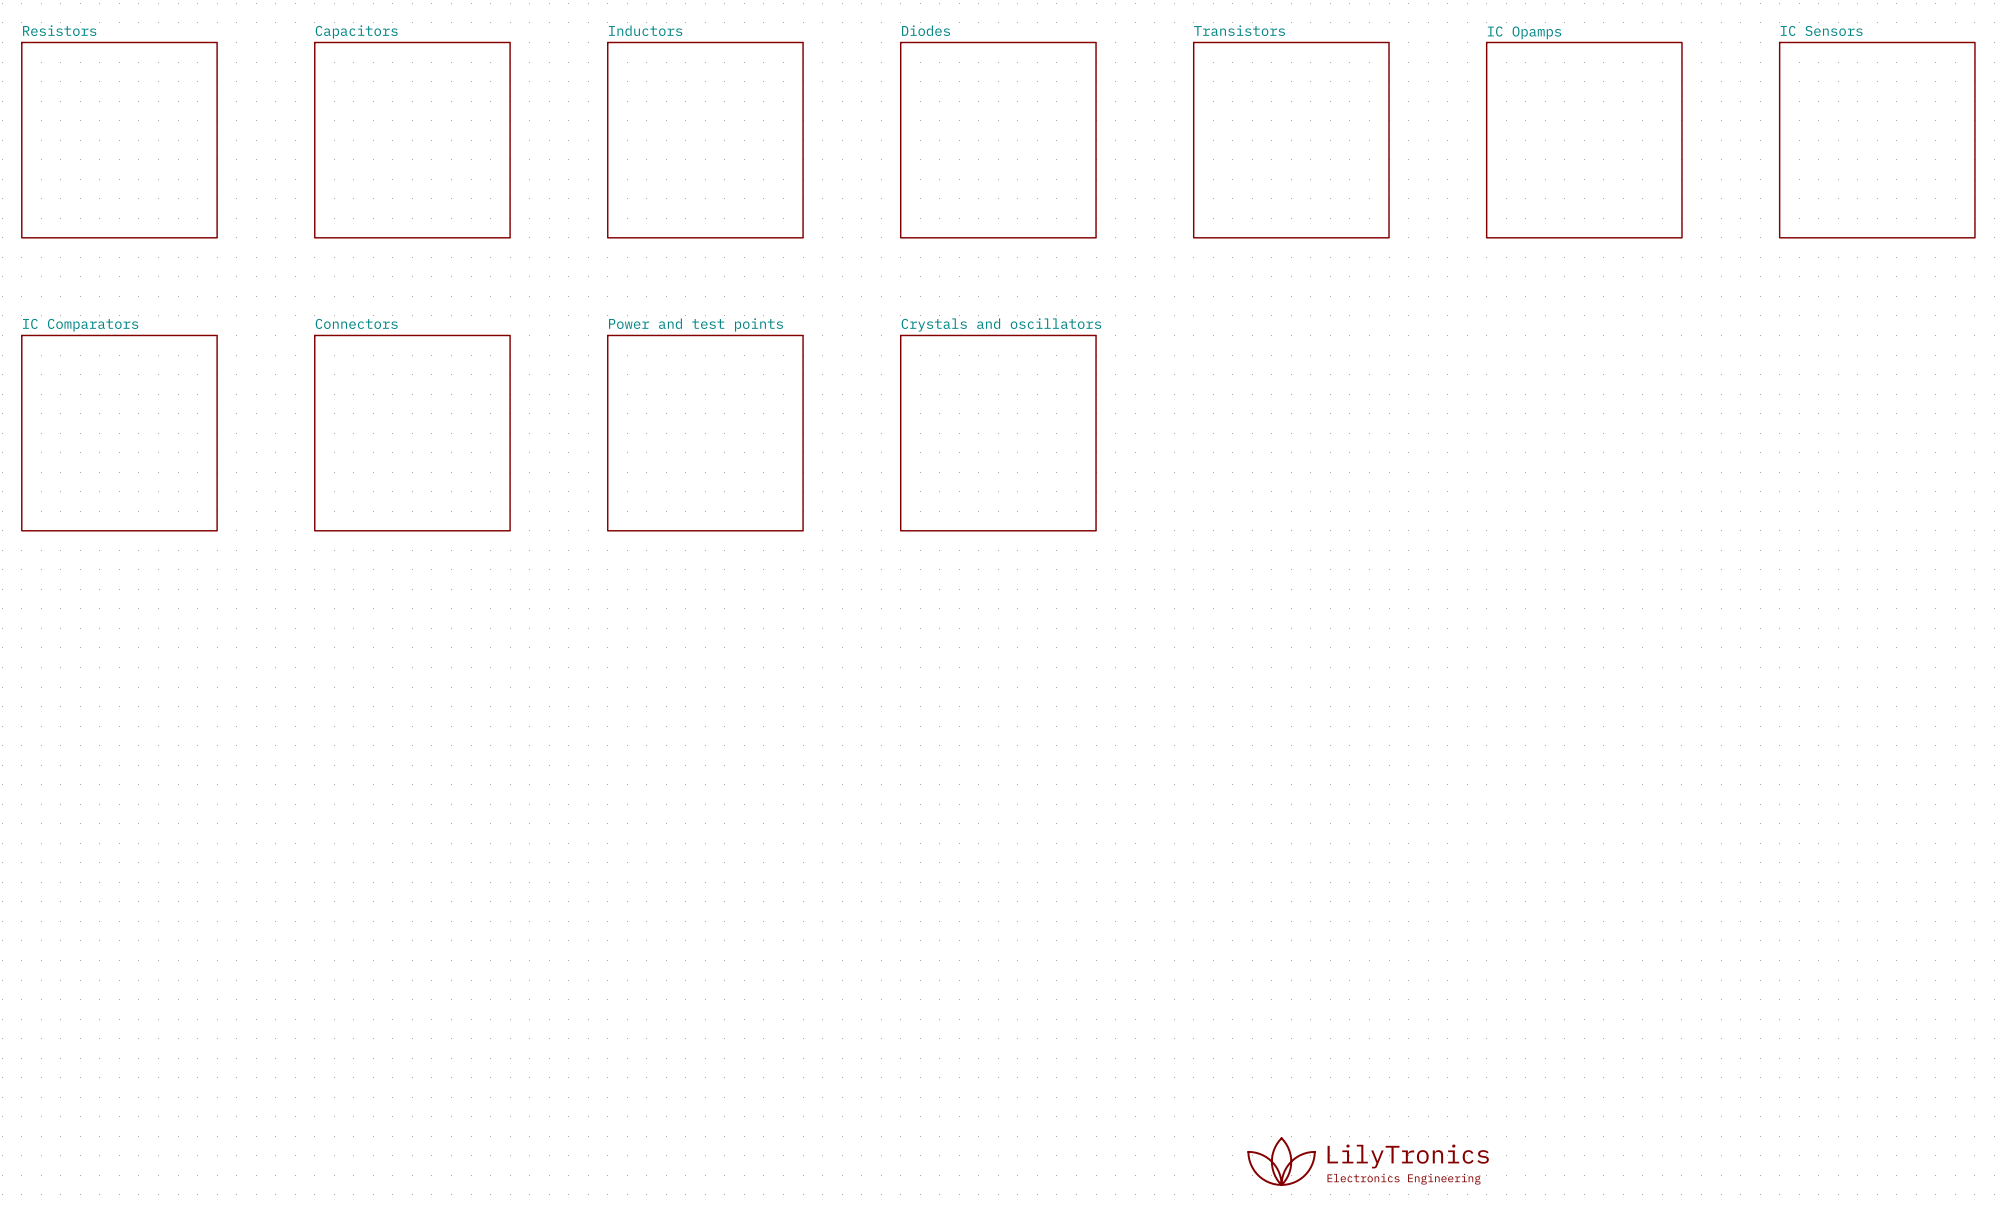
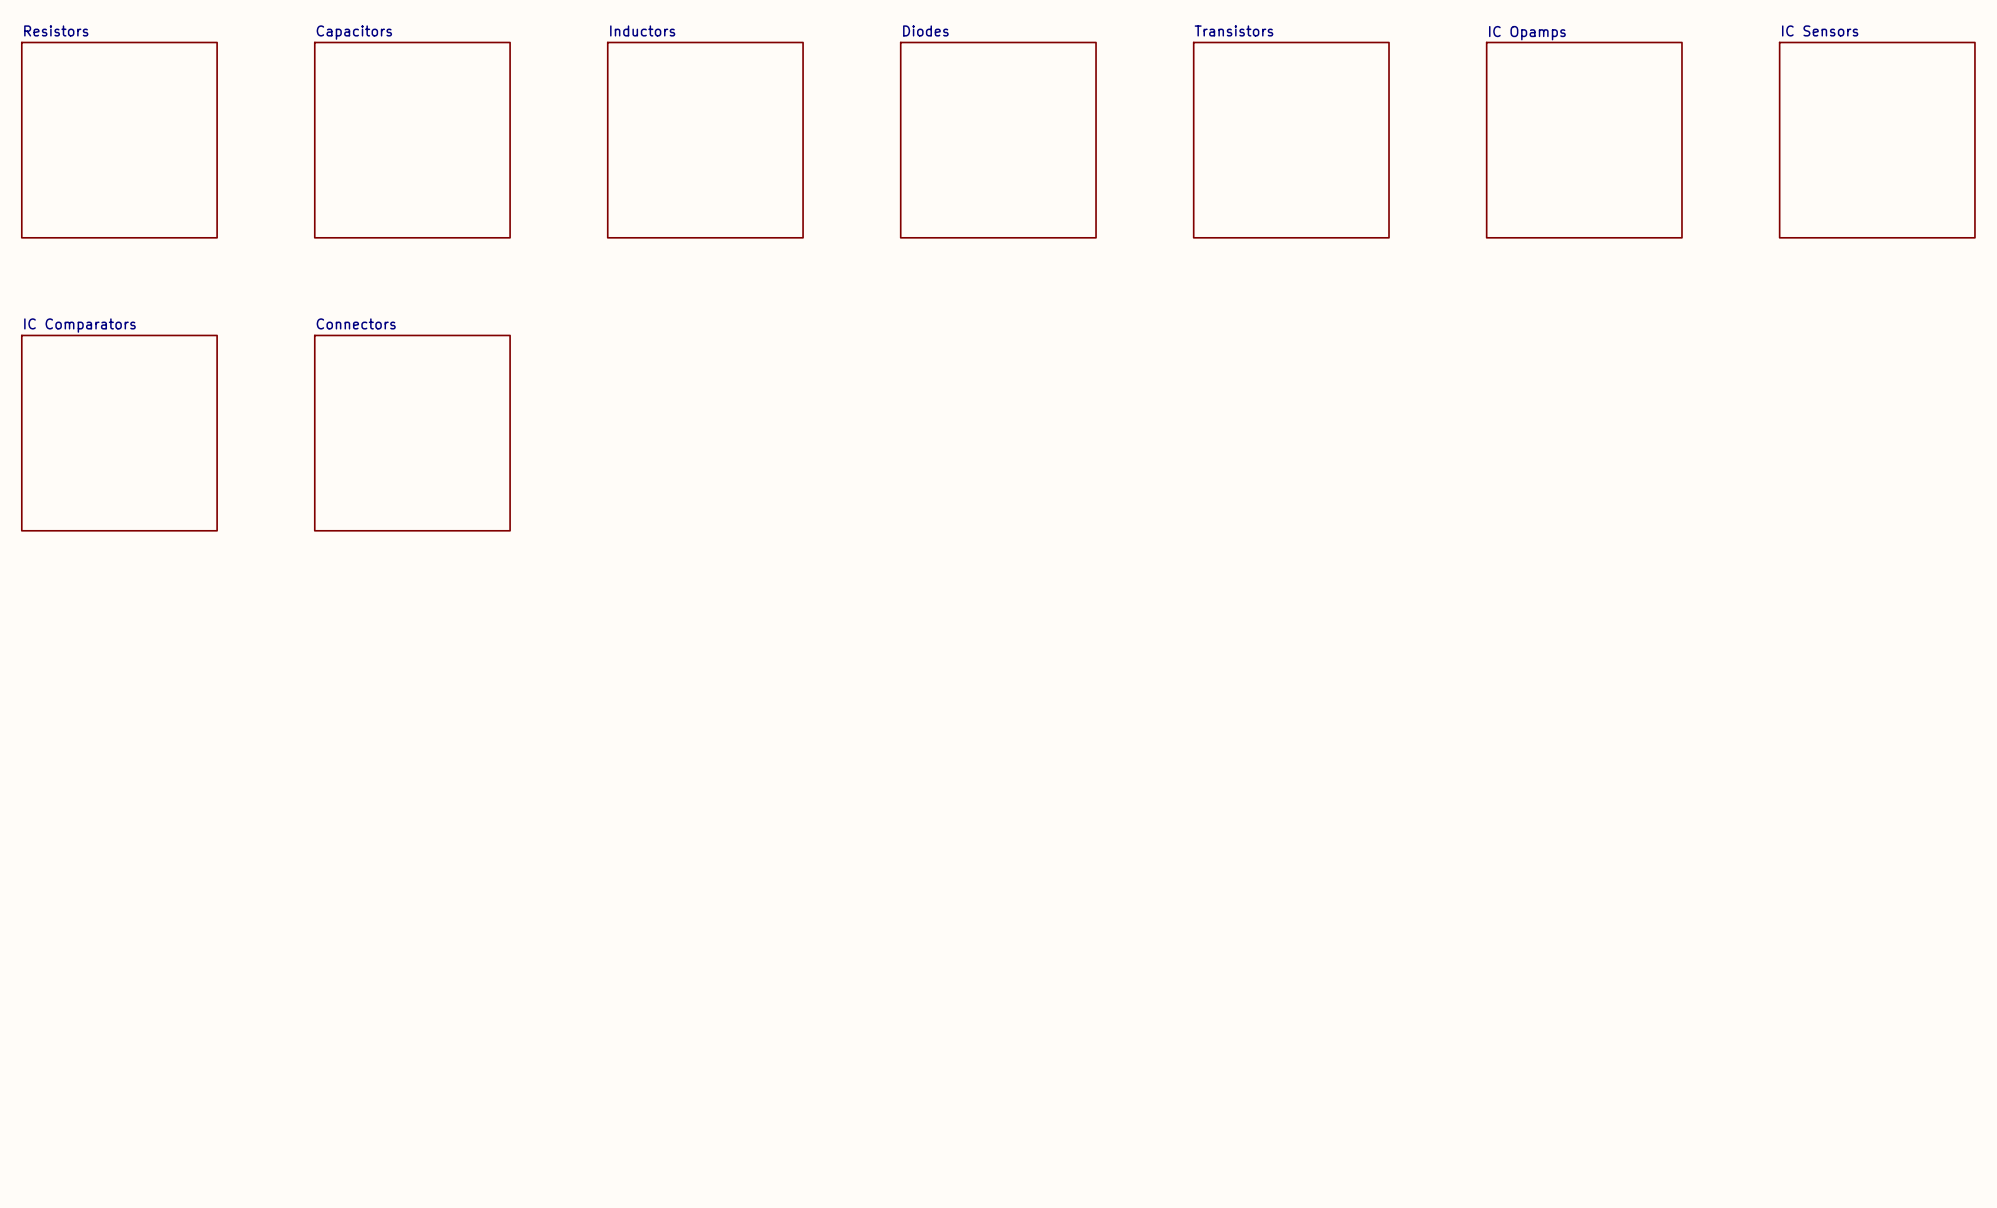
sheet Power and test points: (705, 433) -> none
sheet Crystals and oscillators: (998, 433) -> none
part: (1281, 1161) -> none

